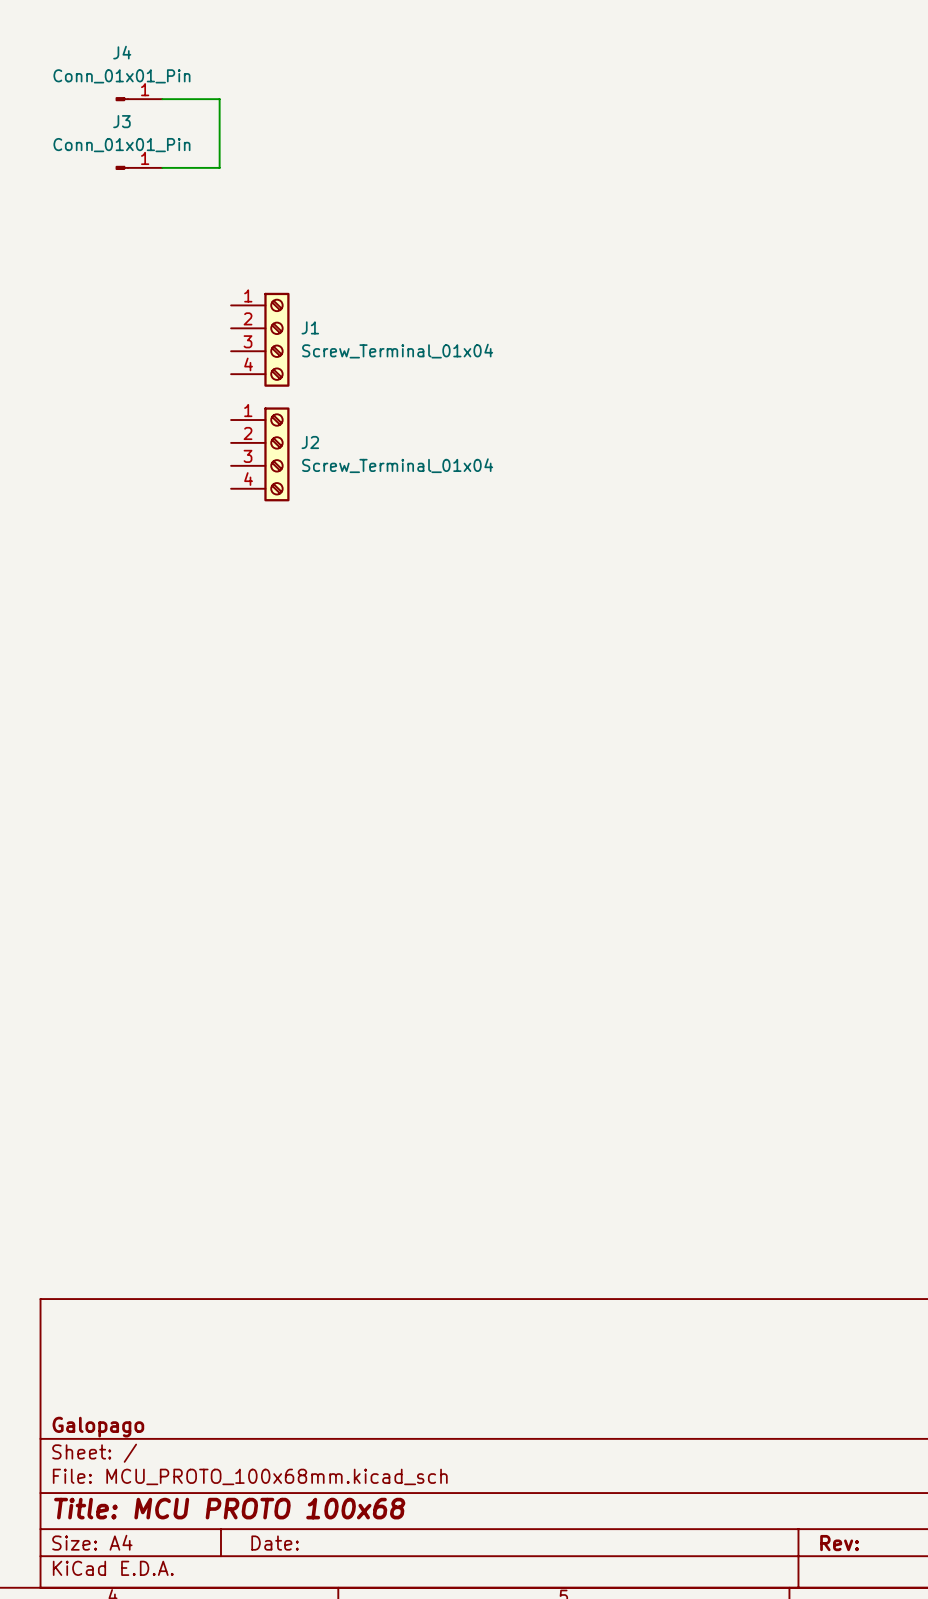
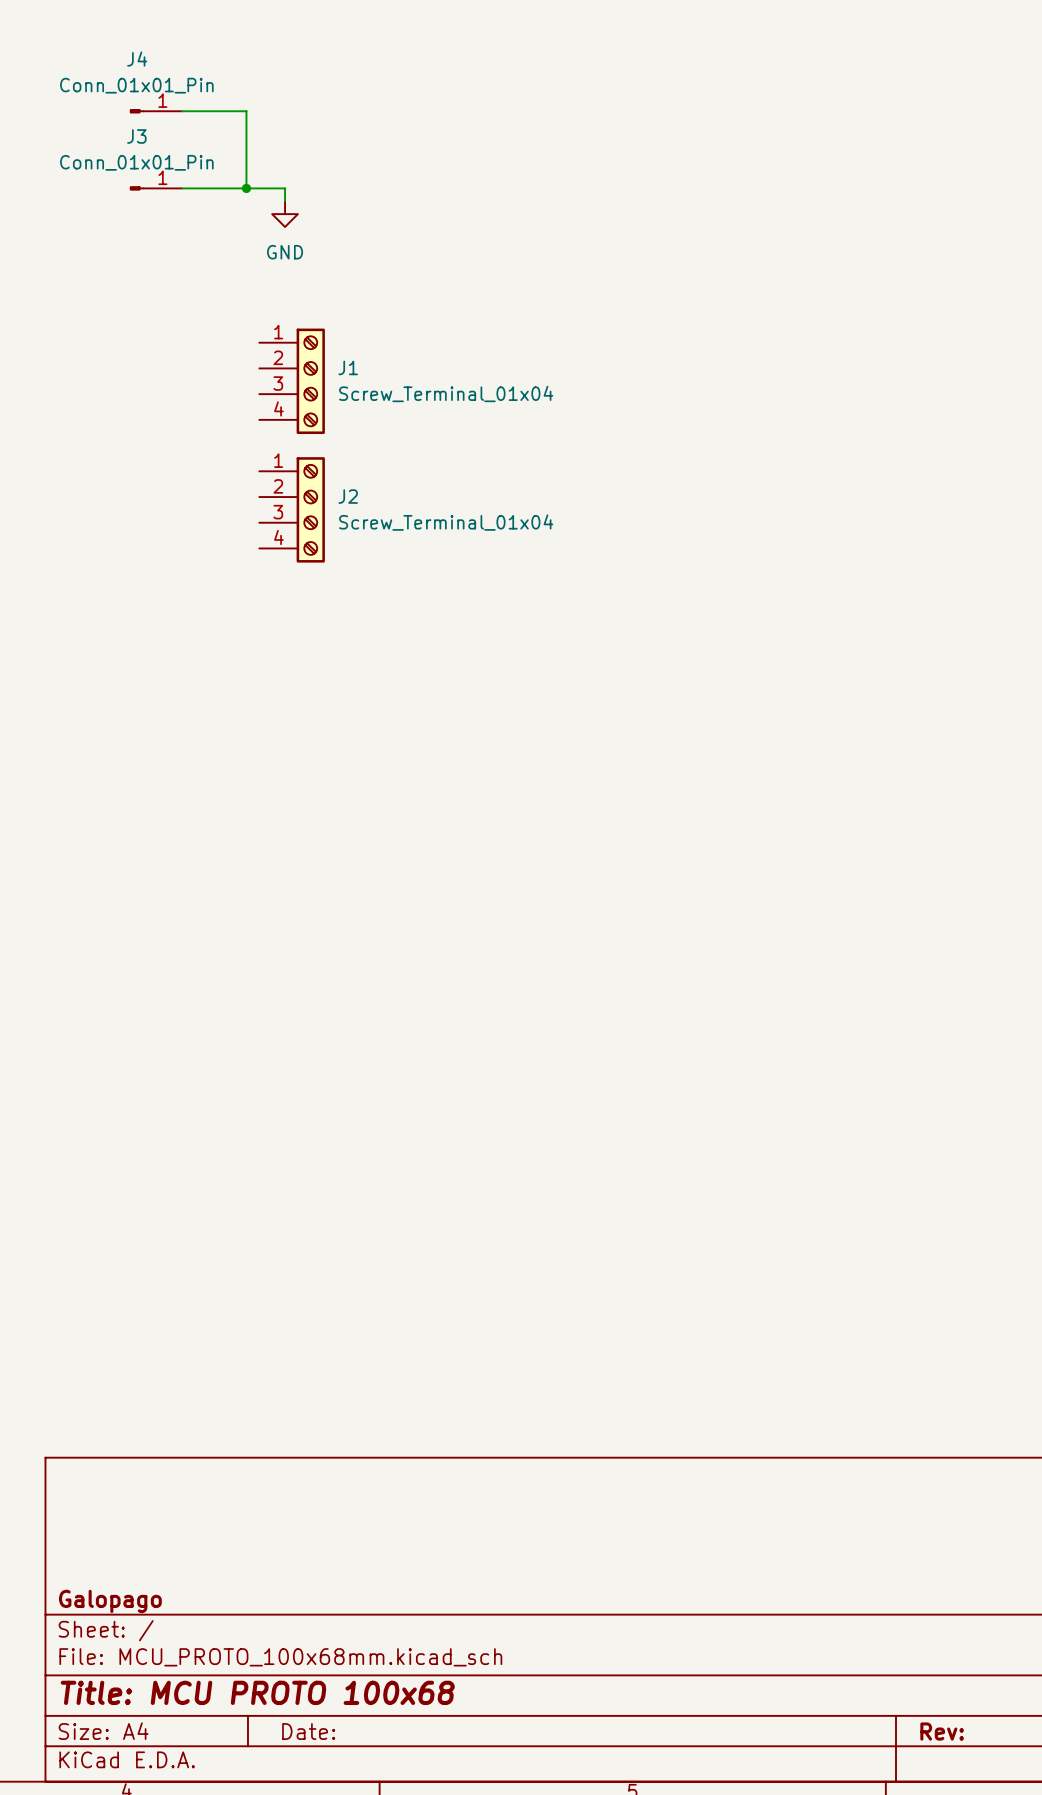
wire: none -> (246, 188) (285, 188) (285, 201)
junction: none -> (246, 188)
power symbol: none -> GND (285, 214)

